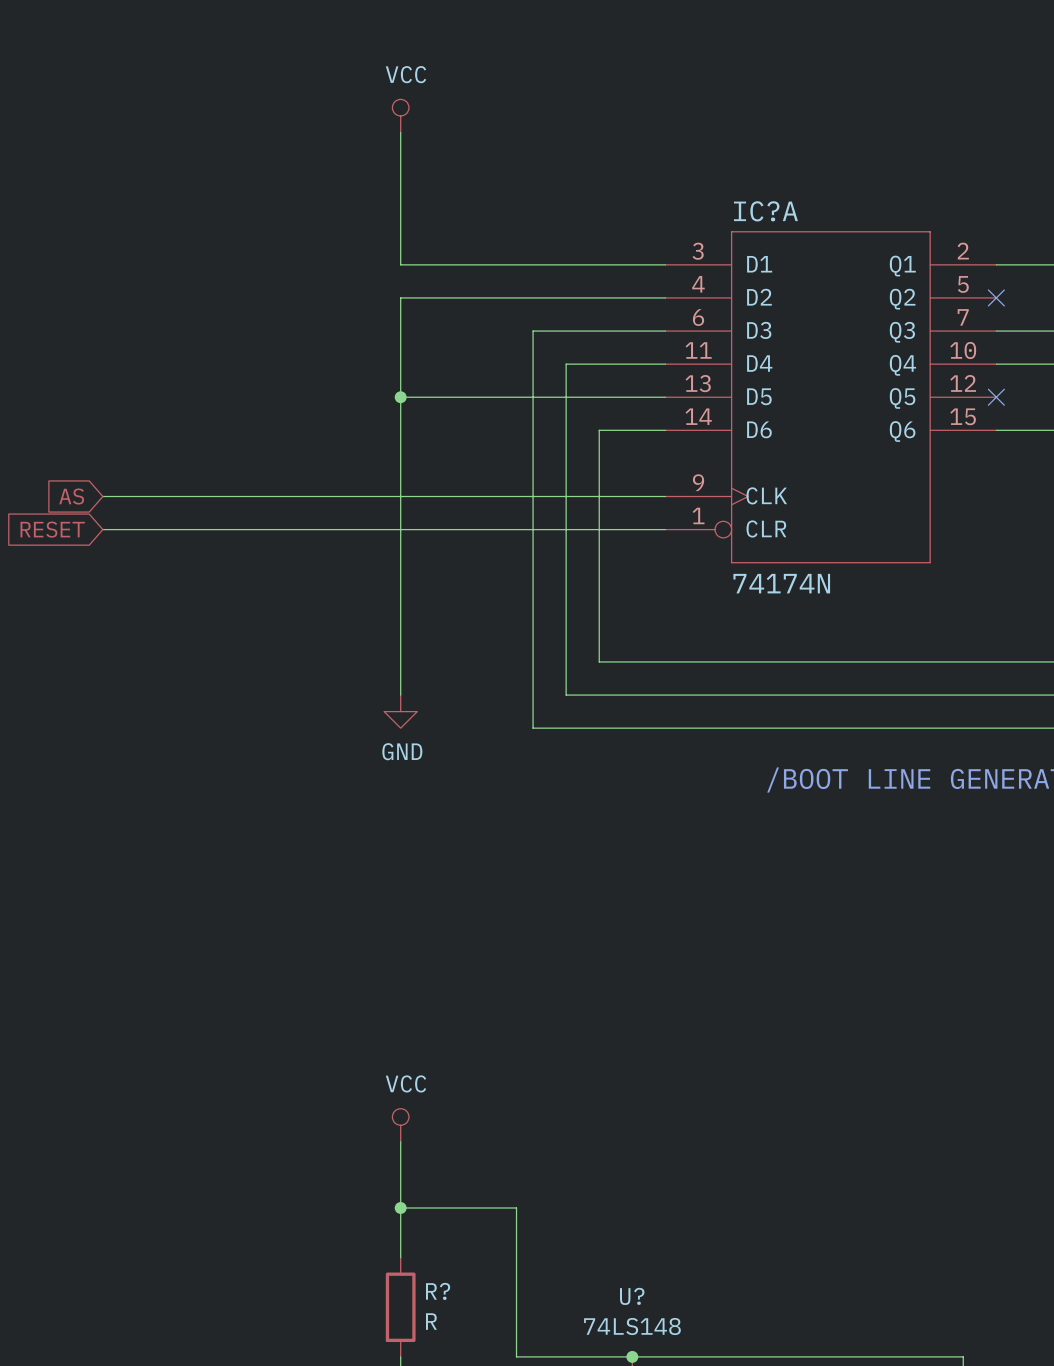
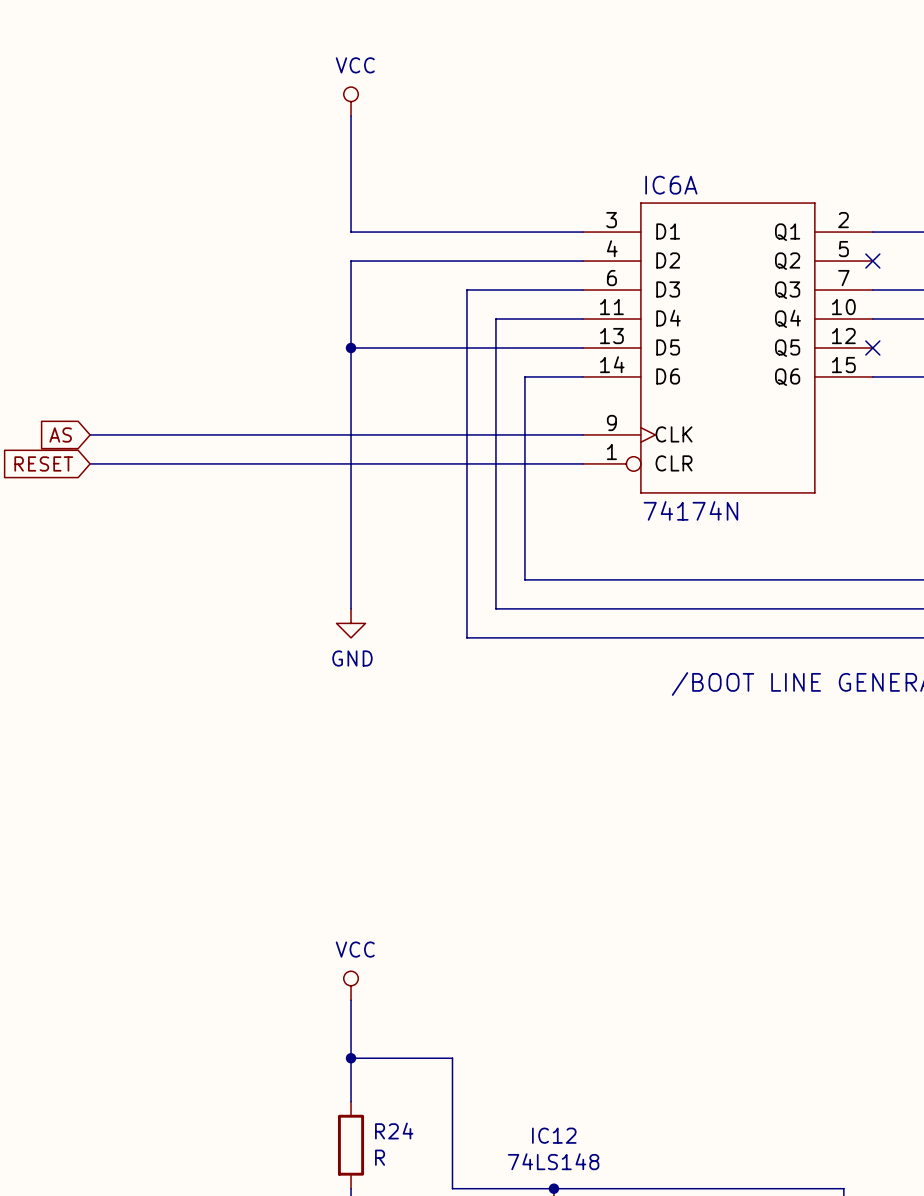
IC?A name: IC?A (765, 211) -> IC6A (671, 185)
R? name: R? (438, 1291) -> R24 (394, 1130)
U? name: U? (632, 1296) -> IC12 (554, 1135)

